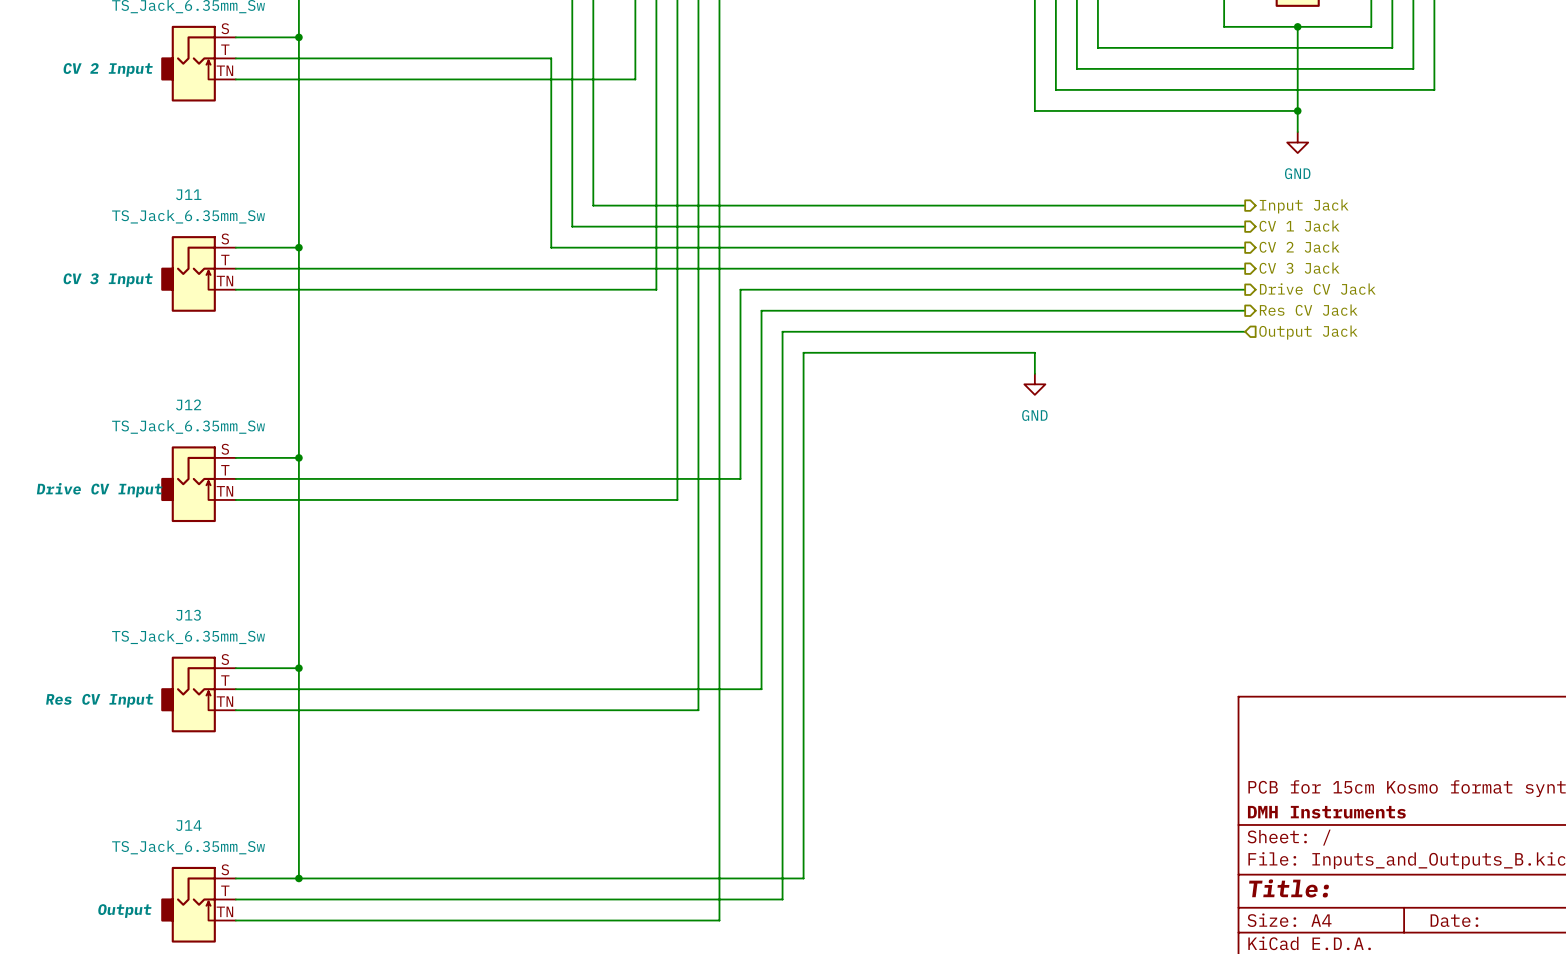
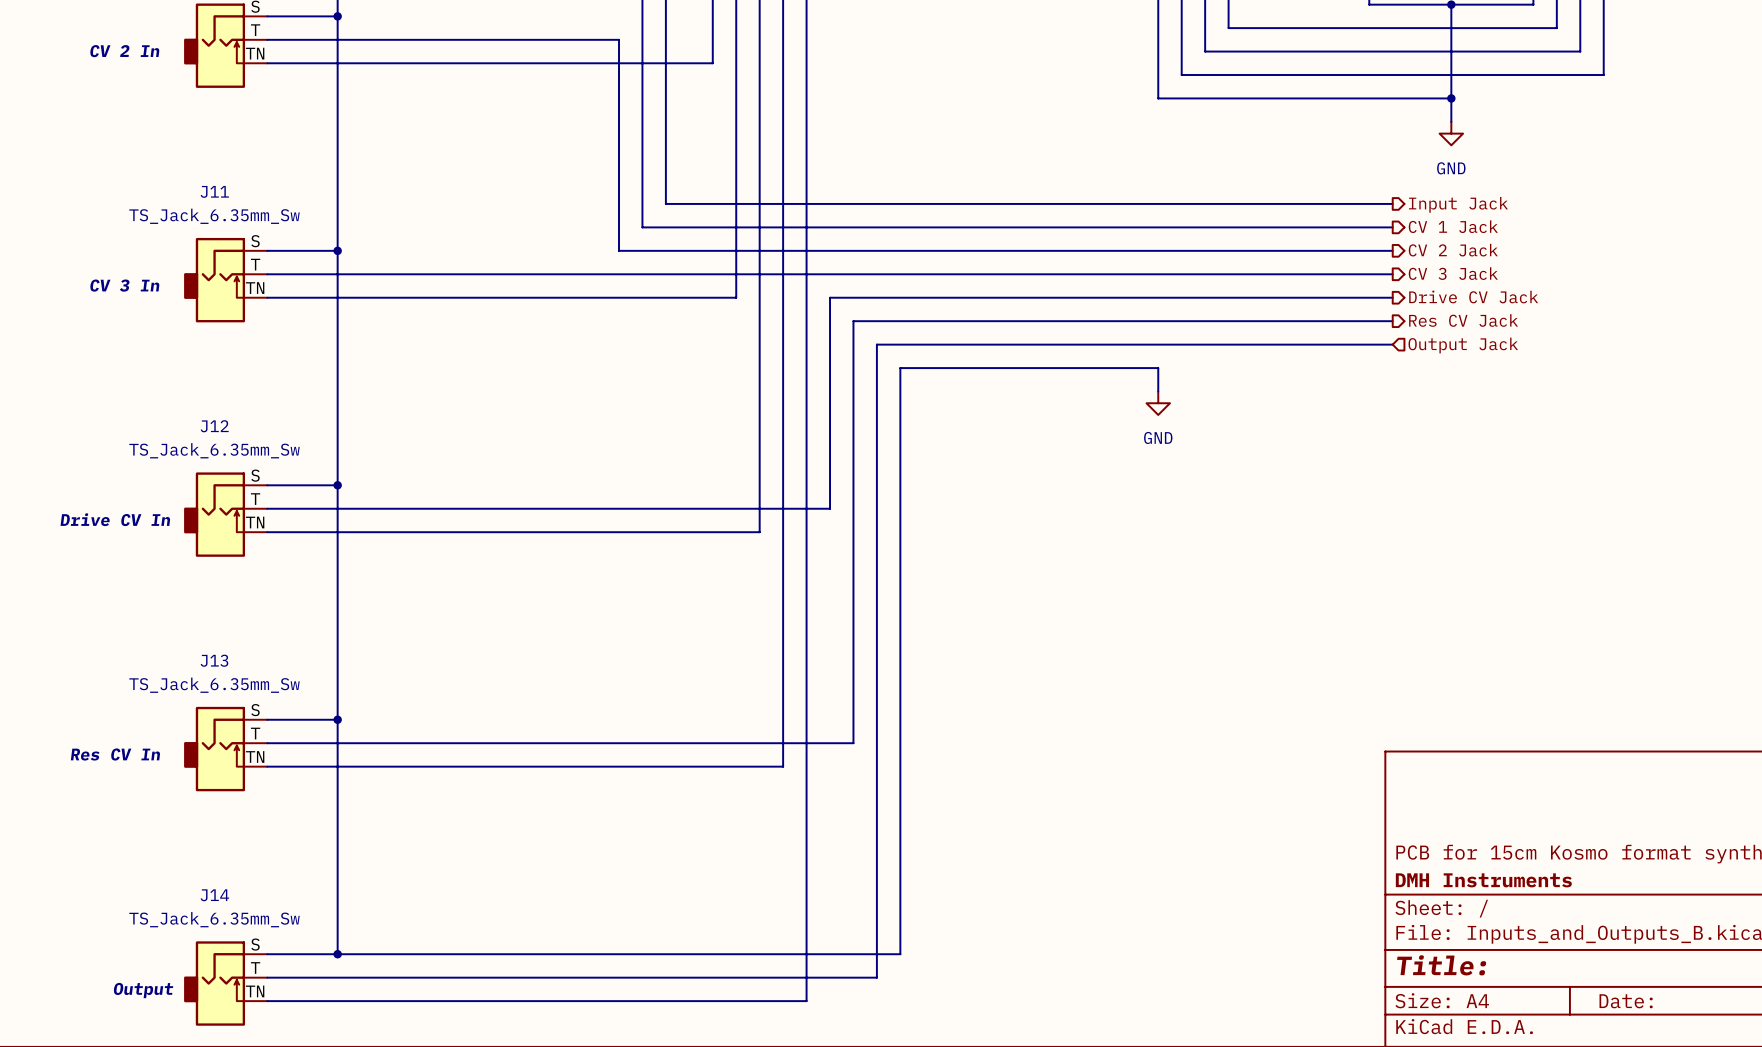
part text: CV 2 Input (108, 69) -> CV 2 In (124, 51)
J11 text: CV 3 Input (108, 280) -> CV 3 In (124, 285)
J12 text: Drive CV Input (99, 490) -> Drive CV In (115, 519)
J13 text: Res CV Input (99, 700) -> Res CV In (115, 754)

